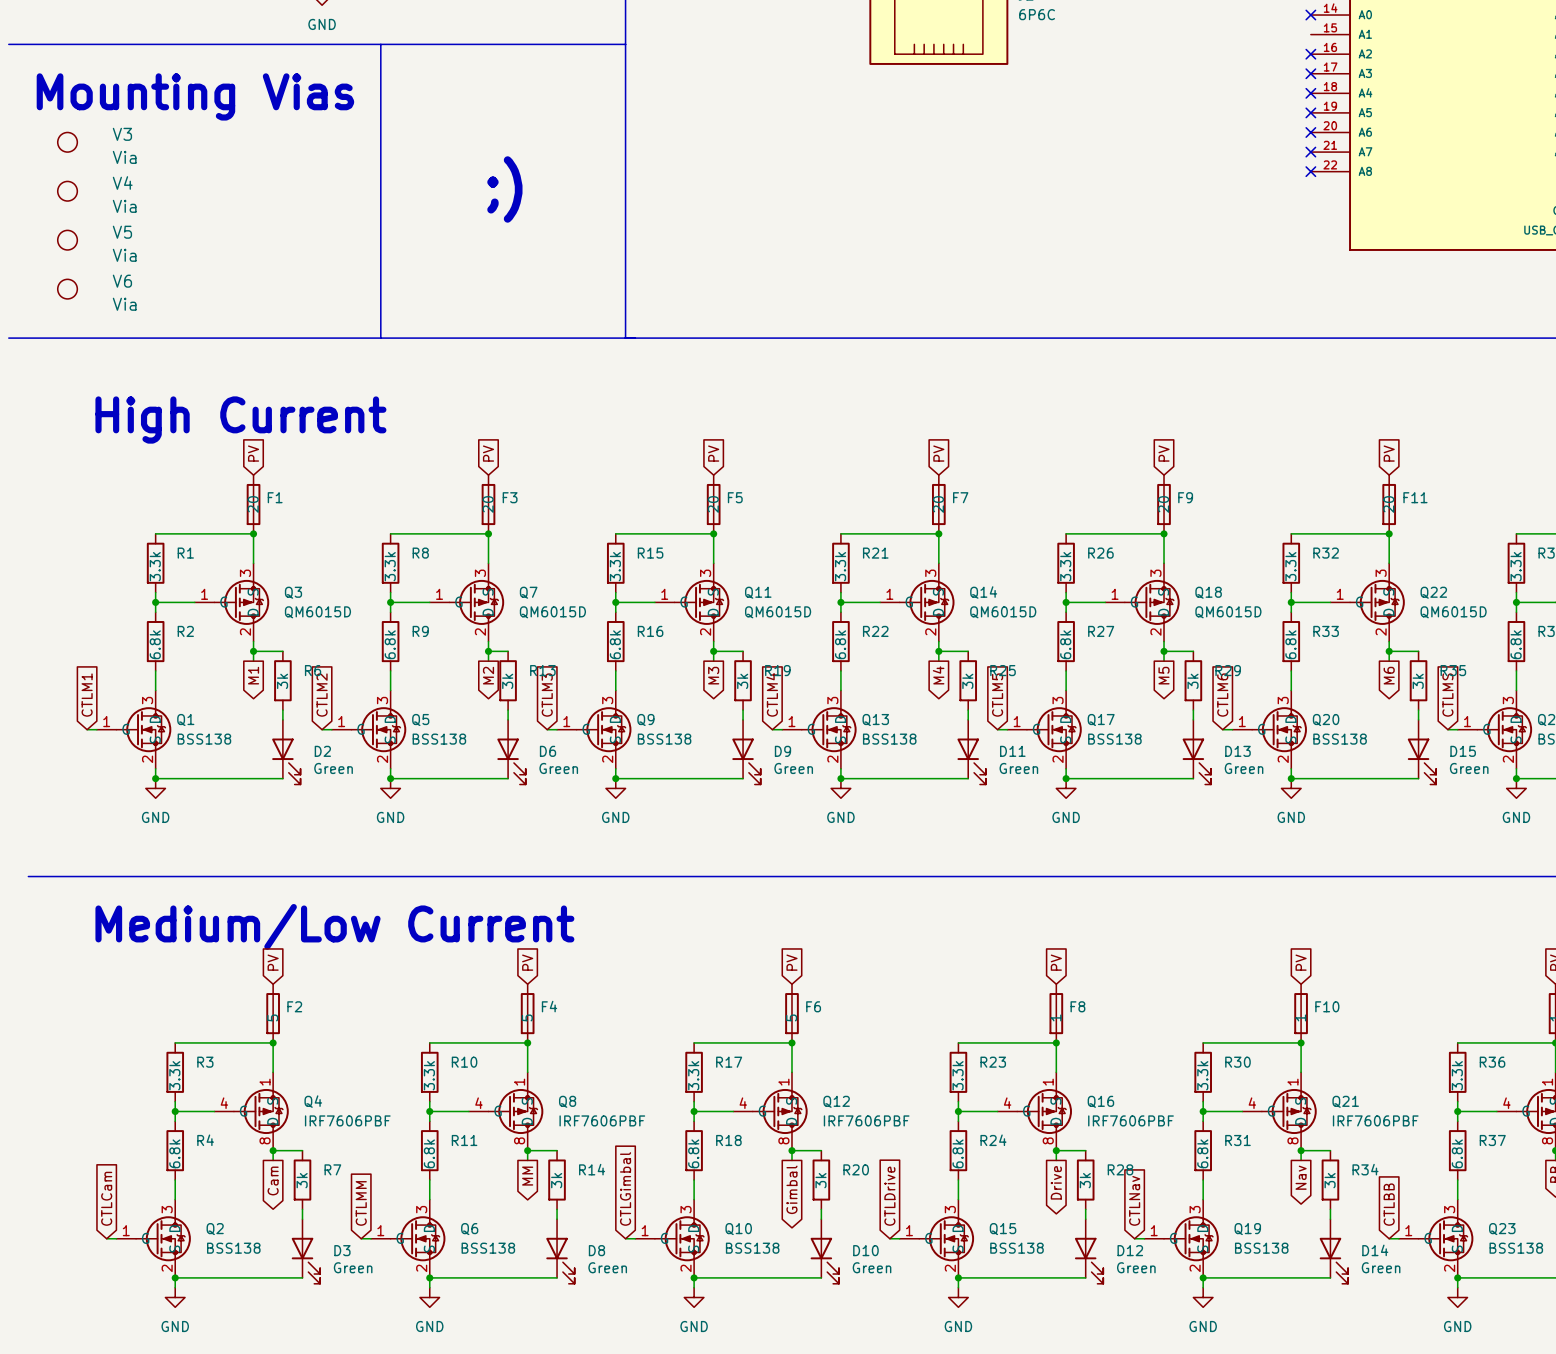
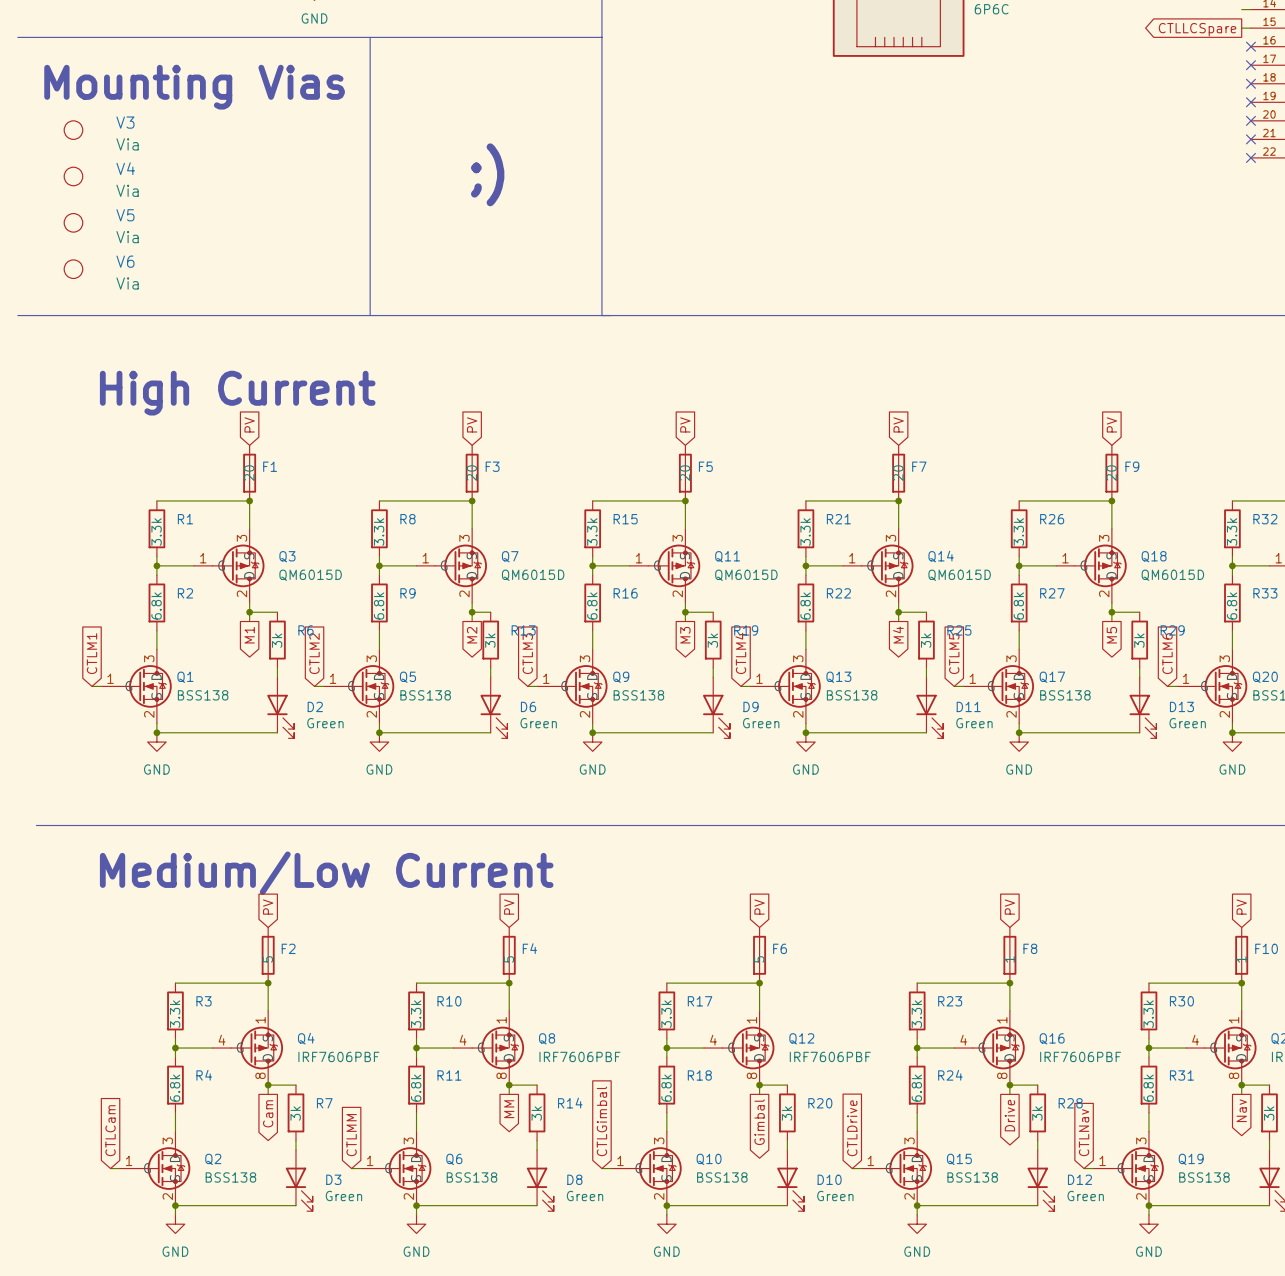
wire: none -> (1241, 9) (1250, 9)
no-connect mark: (1310, 15) -> none
wire: none -> (1241, 28) (1250, 28)
global label: none -> CTLLCSpare (1197, 29)

